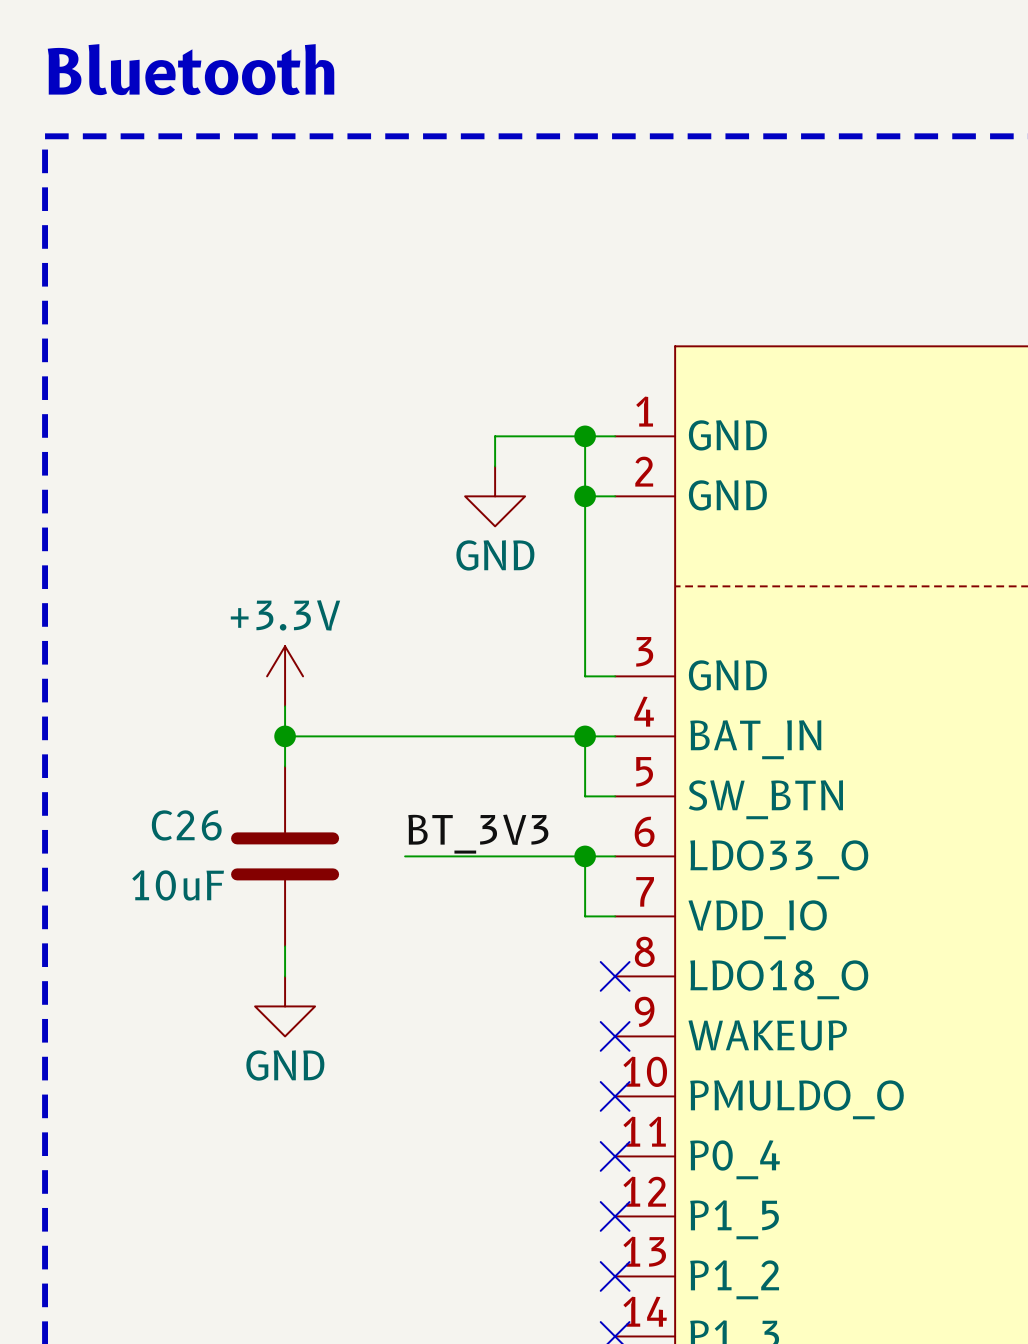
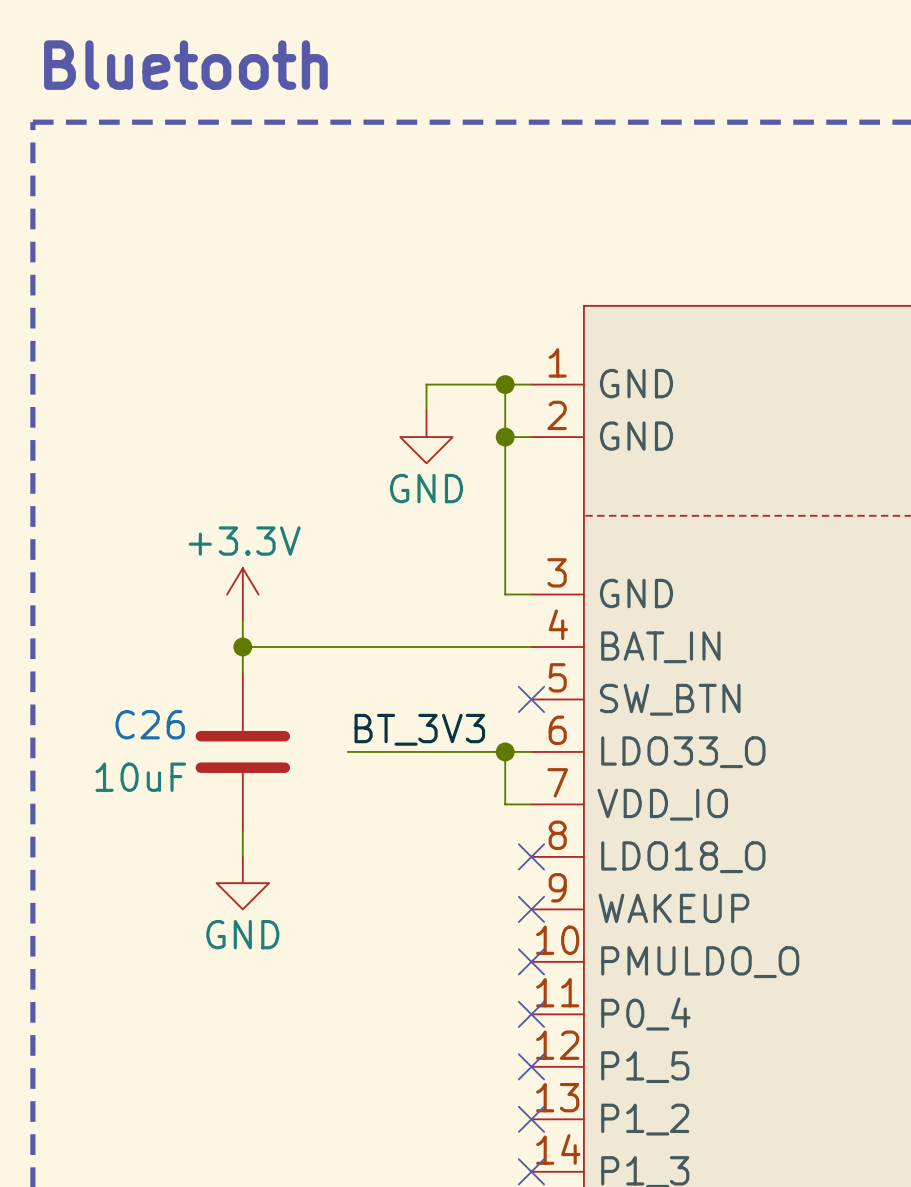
wire: (585, 736) (585, 796) (615, 796) -> none
junction: (585, 736) -> none
no-connect mark: none -> (531, 699)

